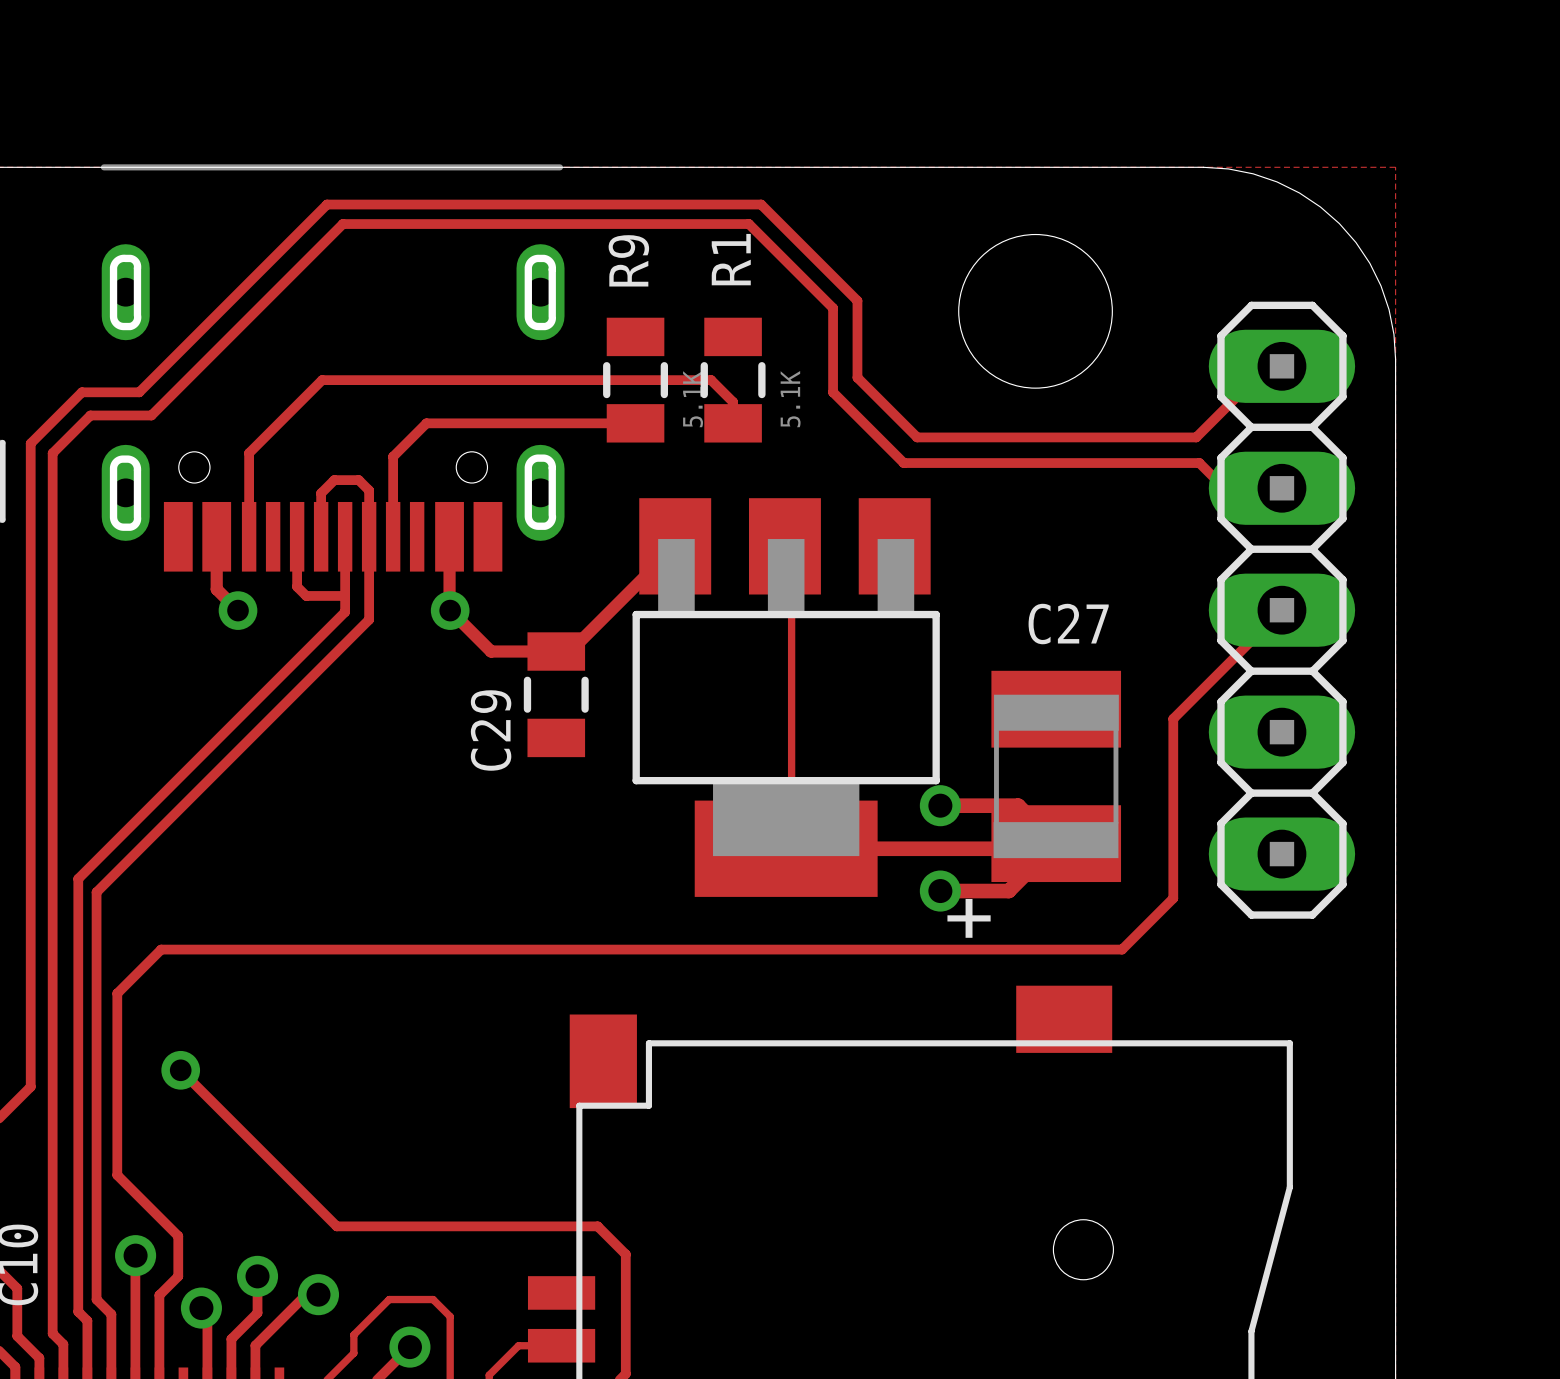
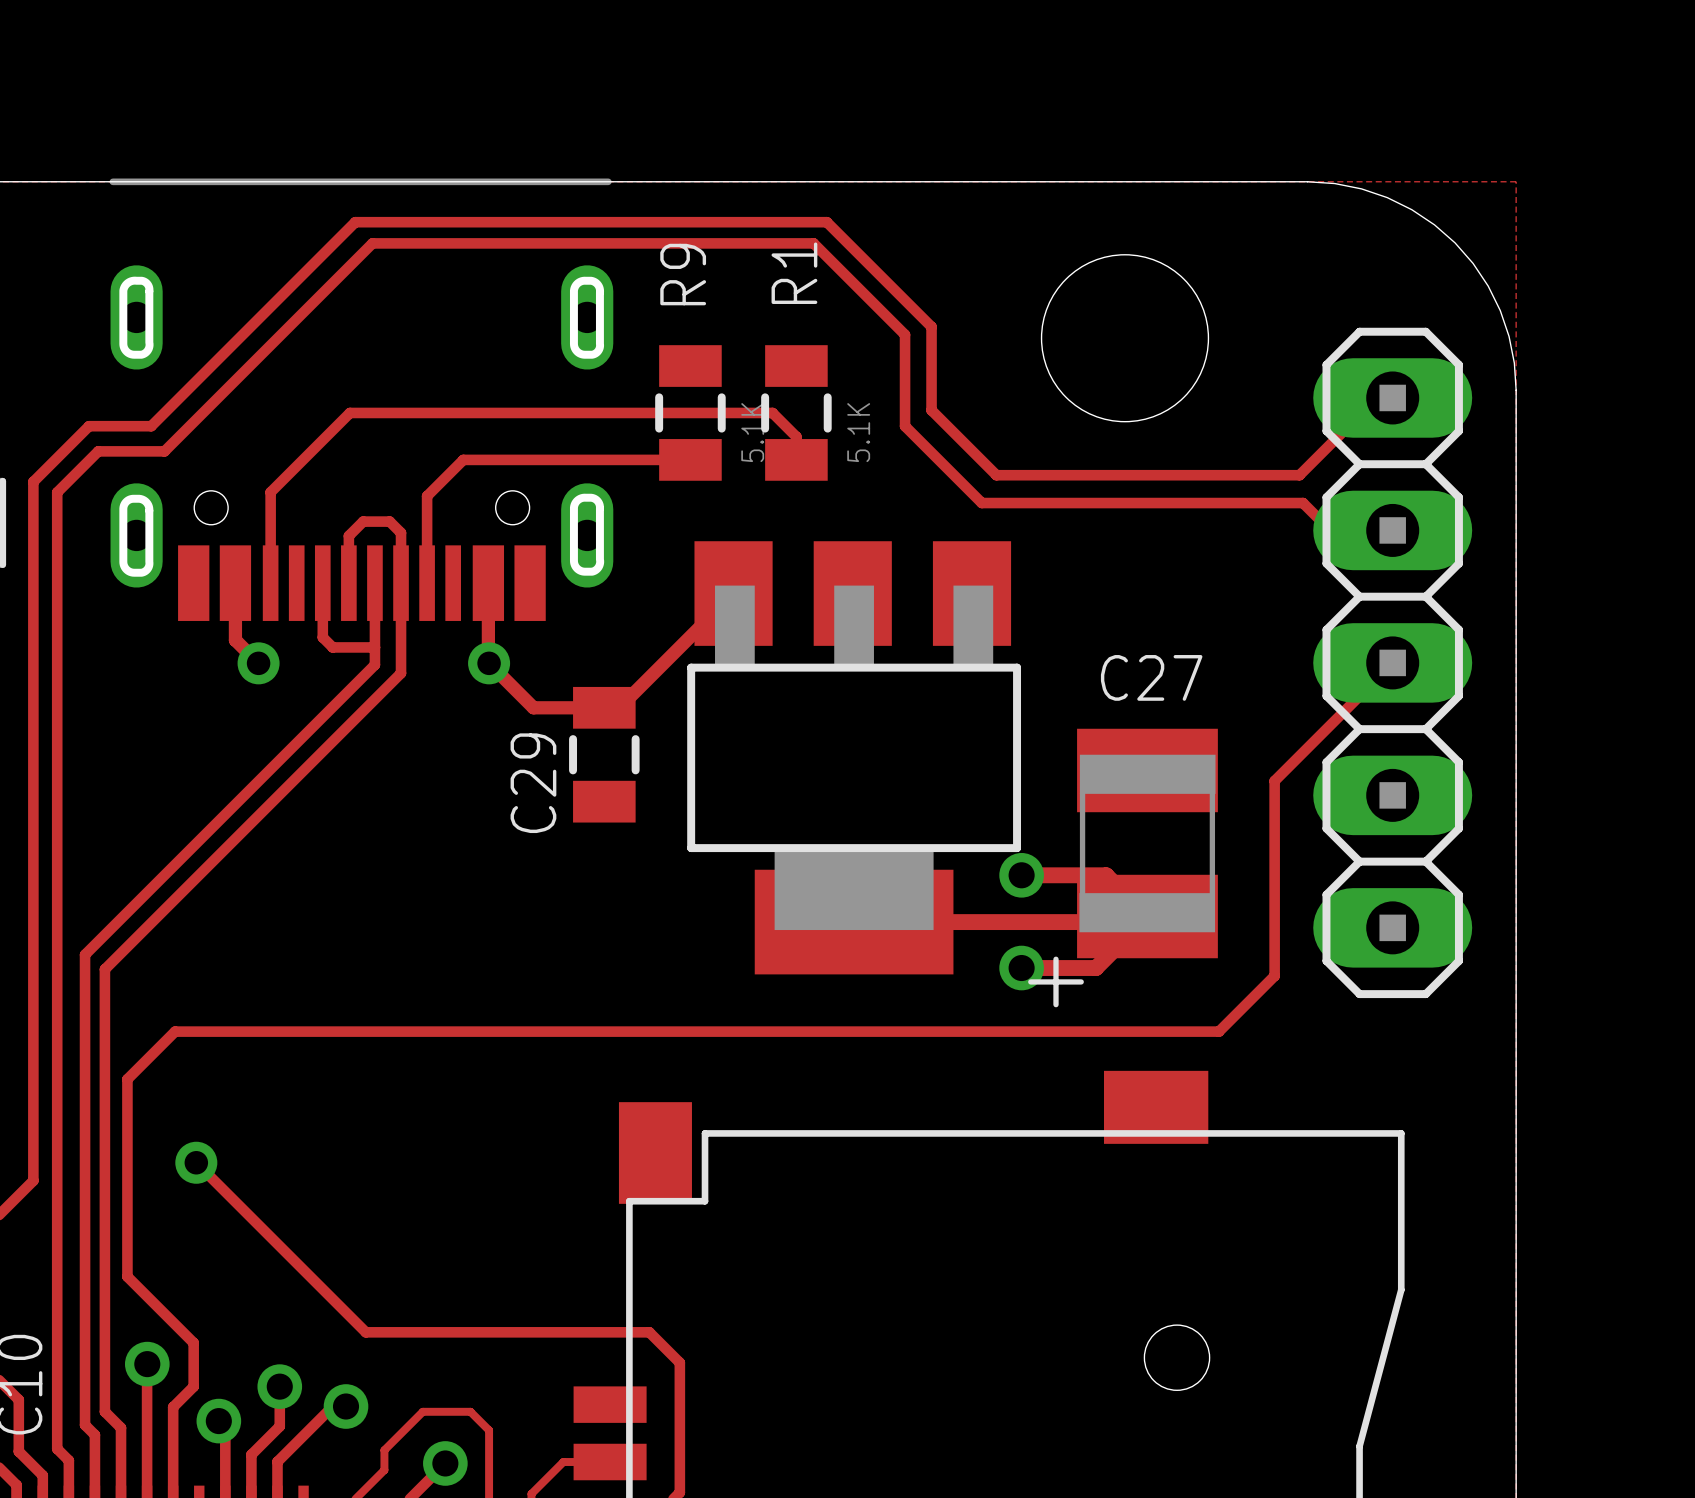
track: (784, 546) (791, 547) (791, 847) (786, 848) -> none

